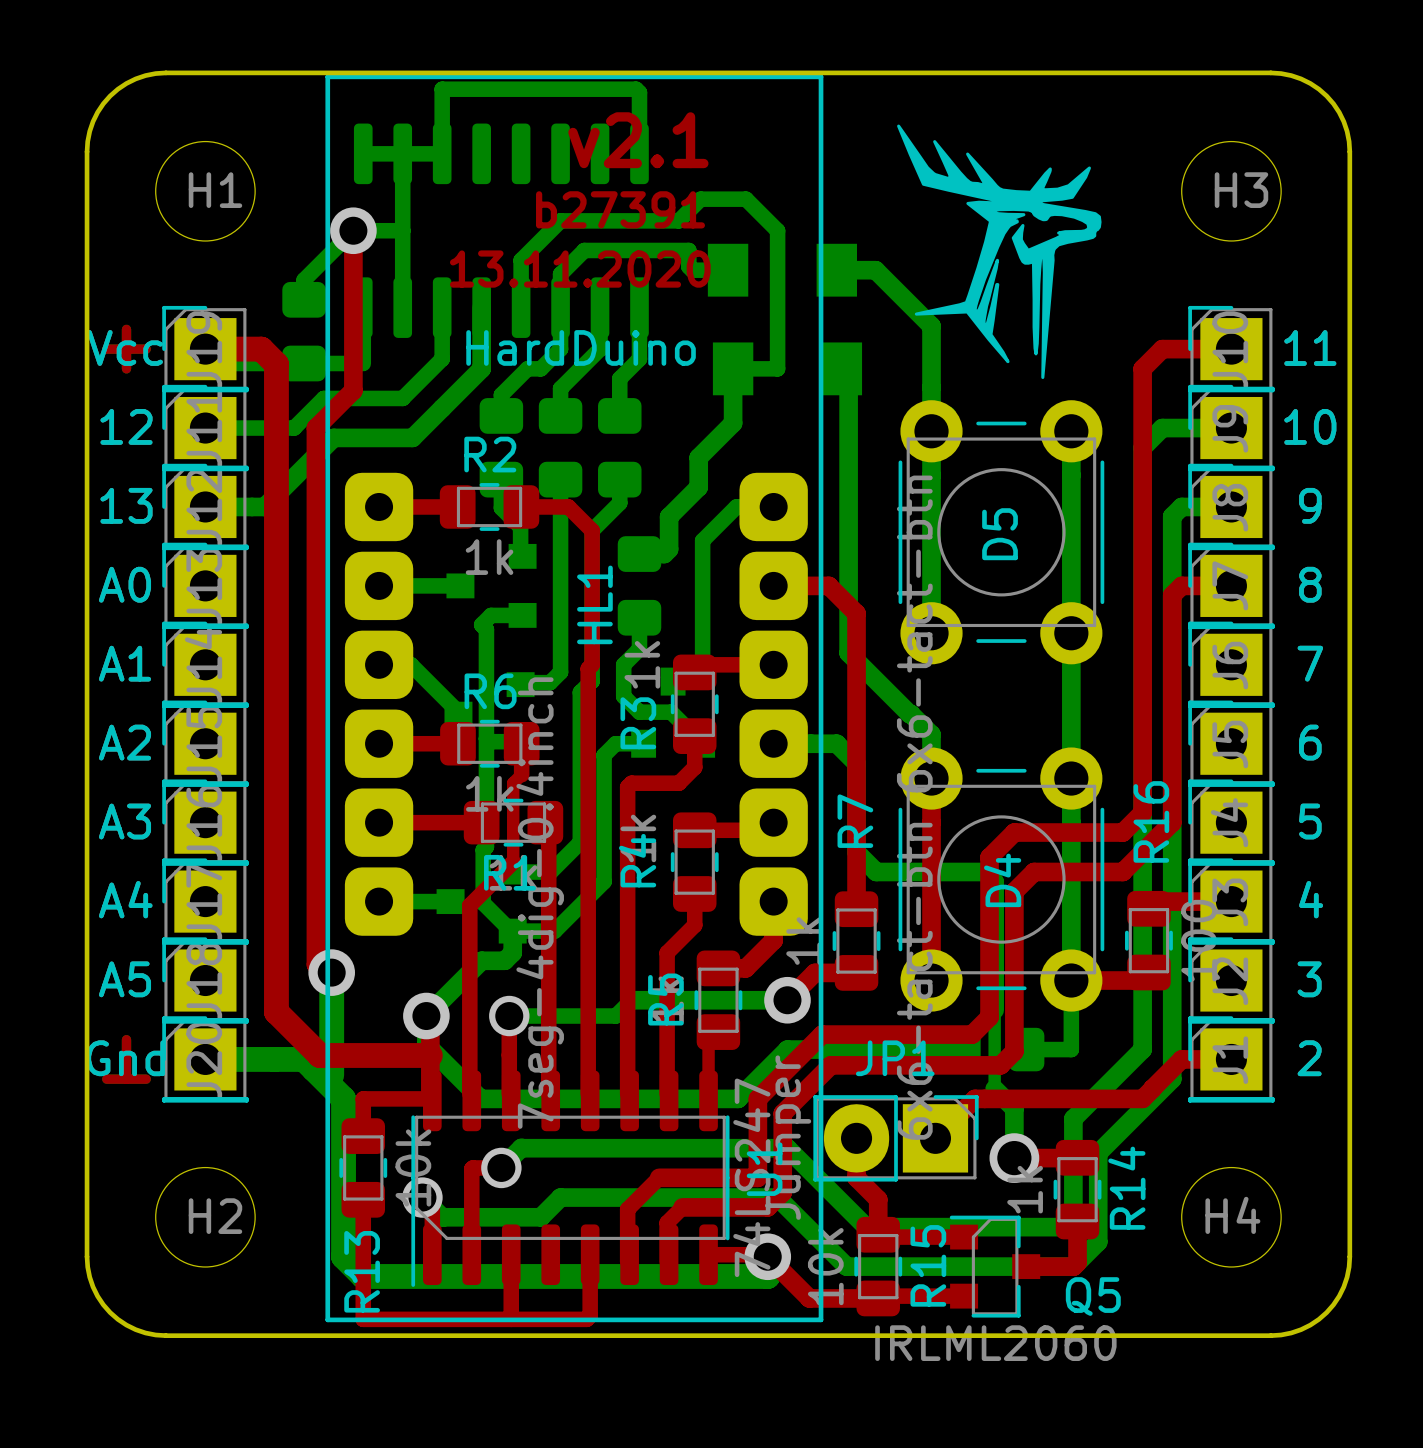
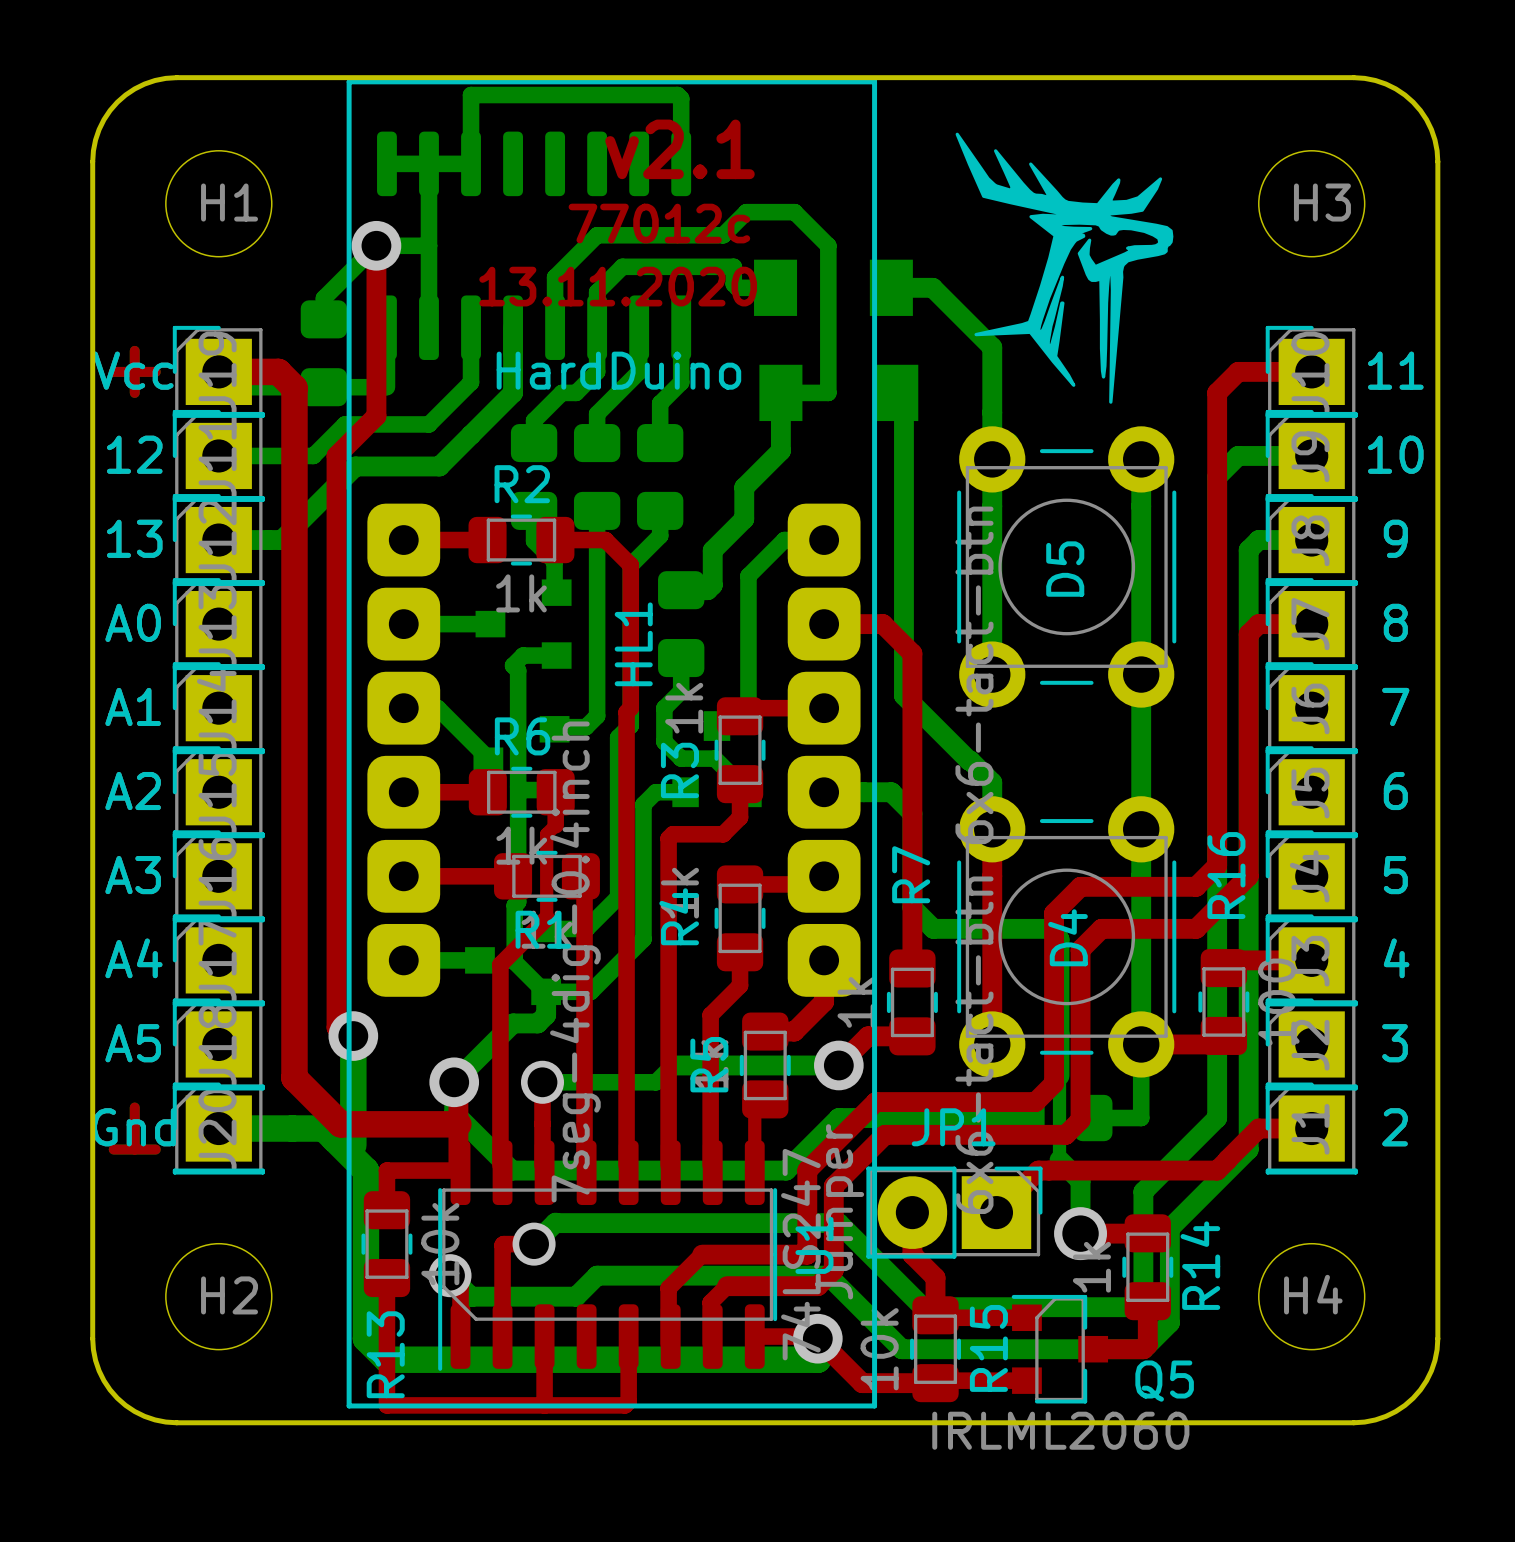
text: b27391 (620, 209) -> 77012c (659, 223)

